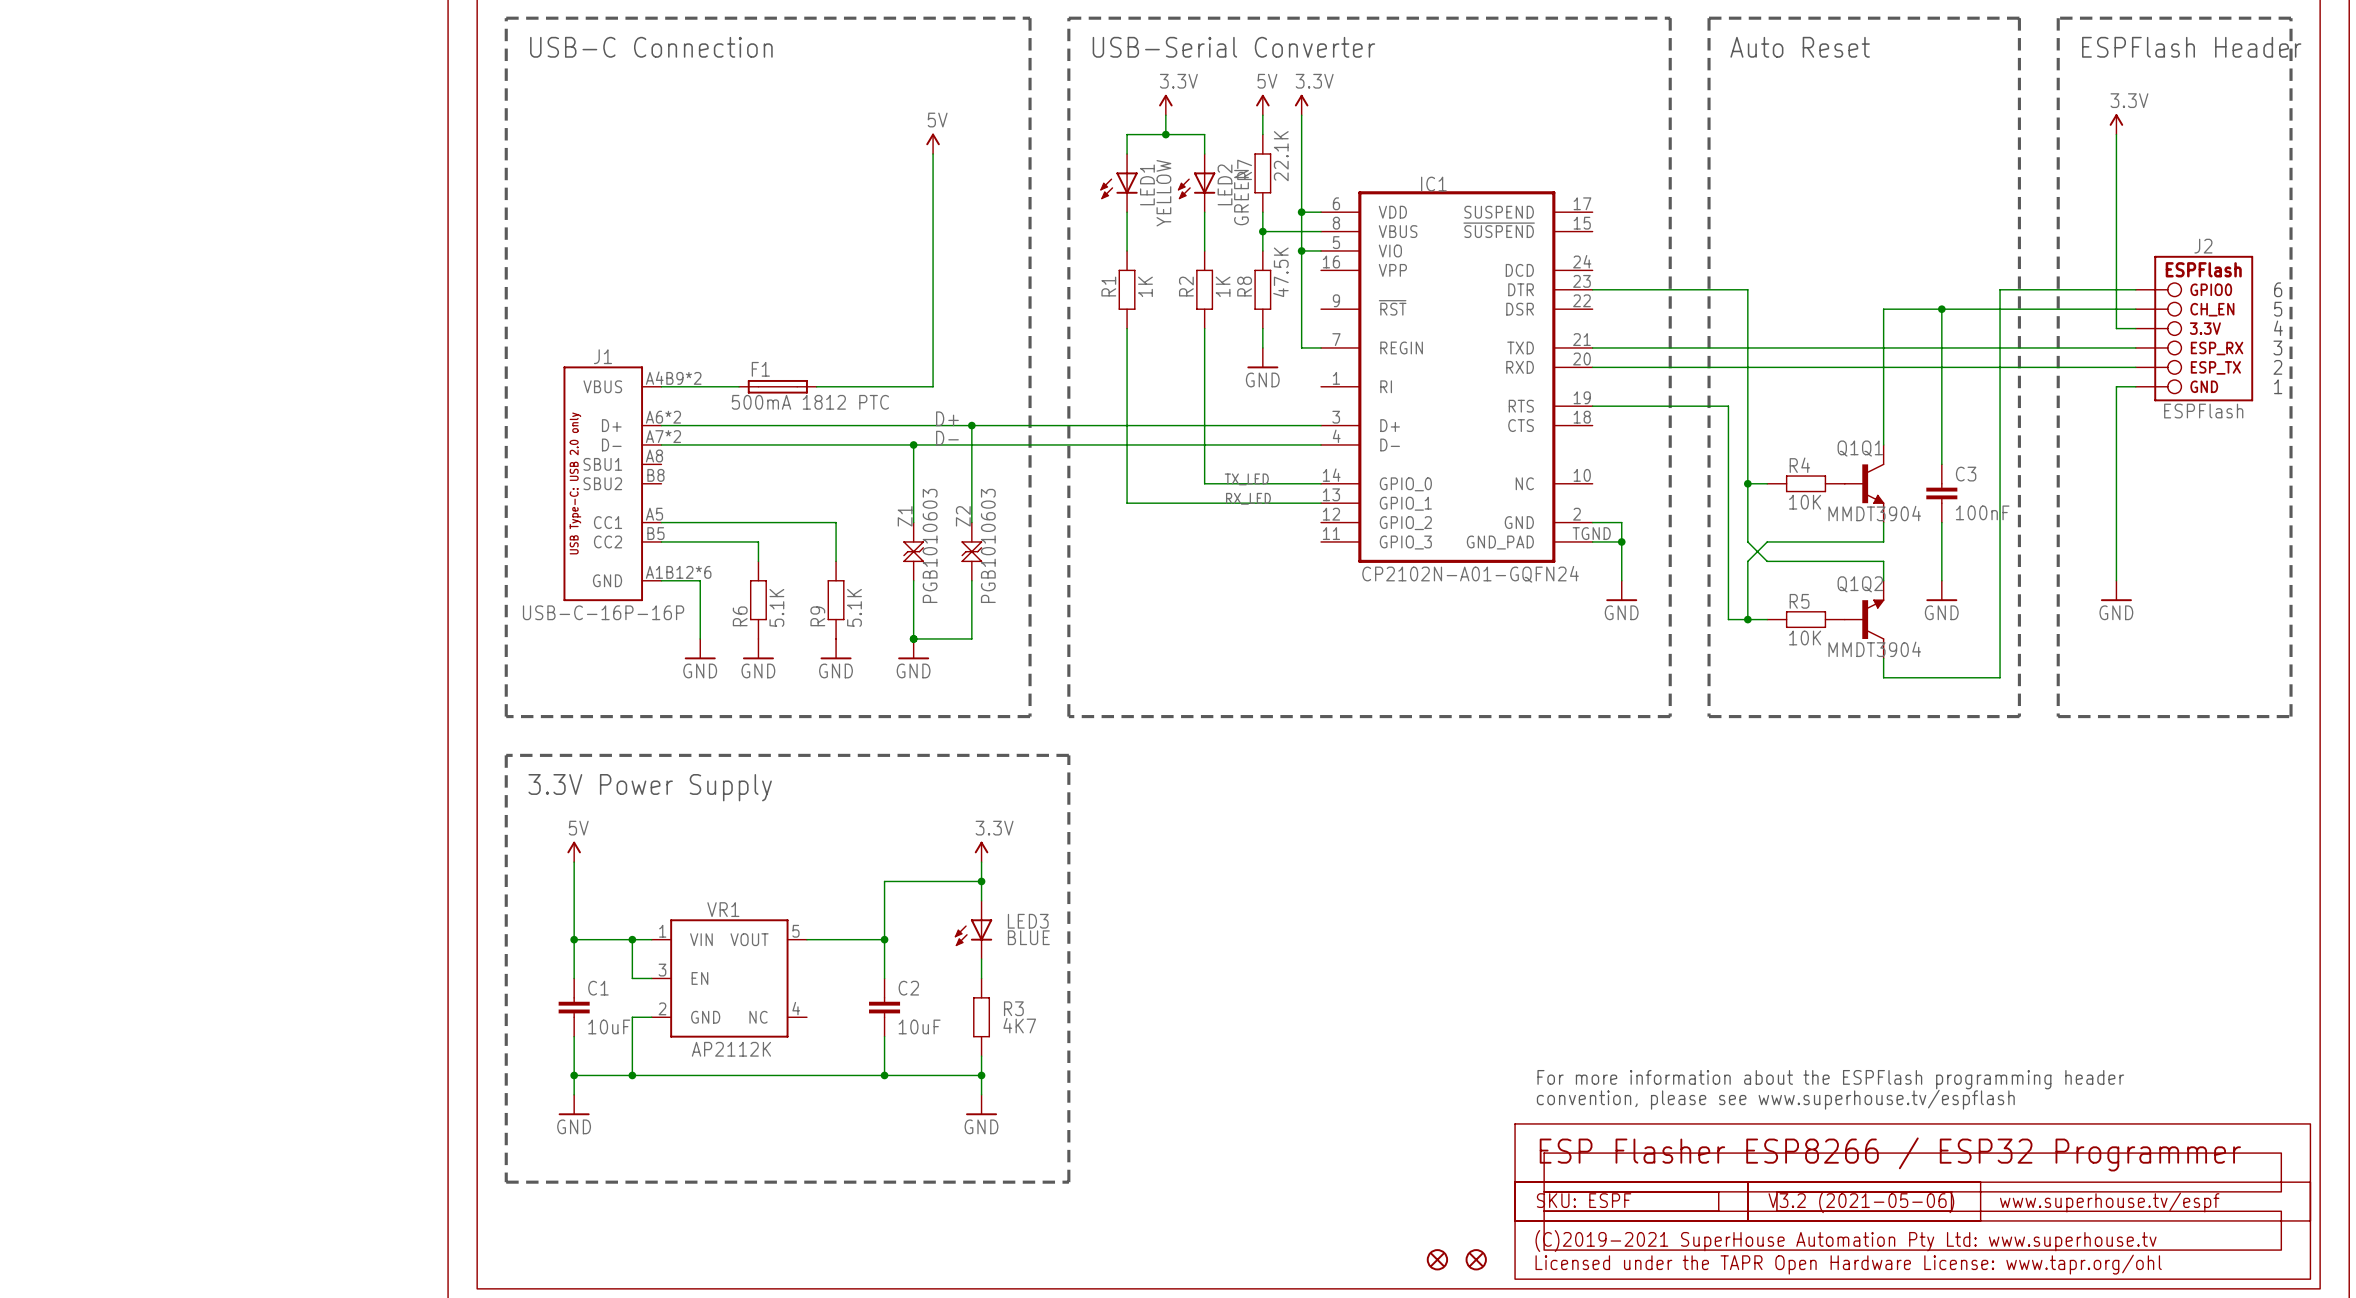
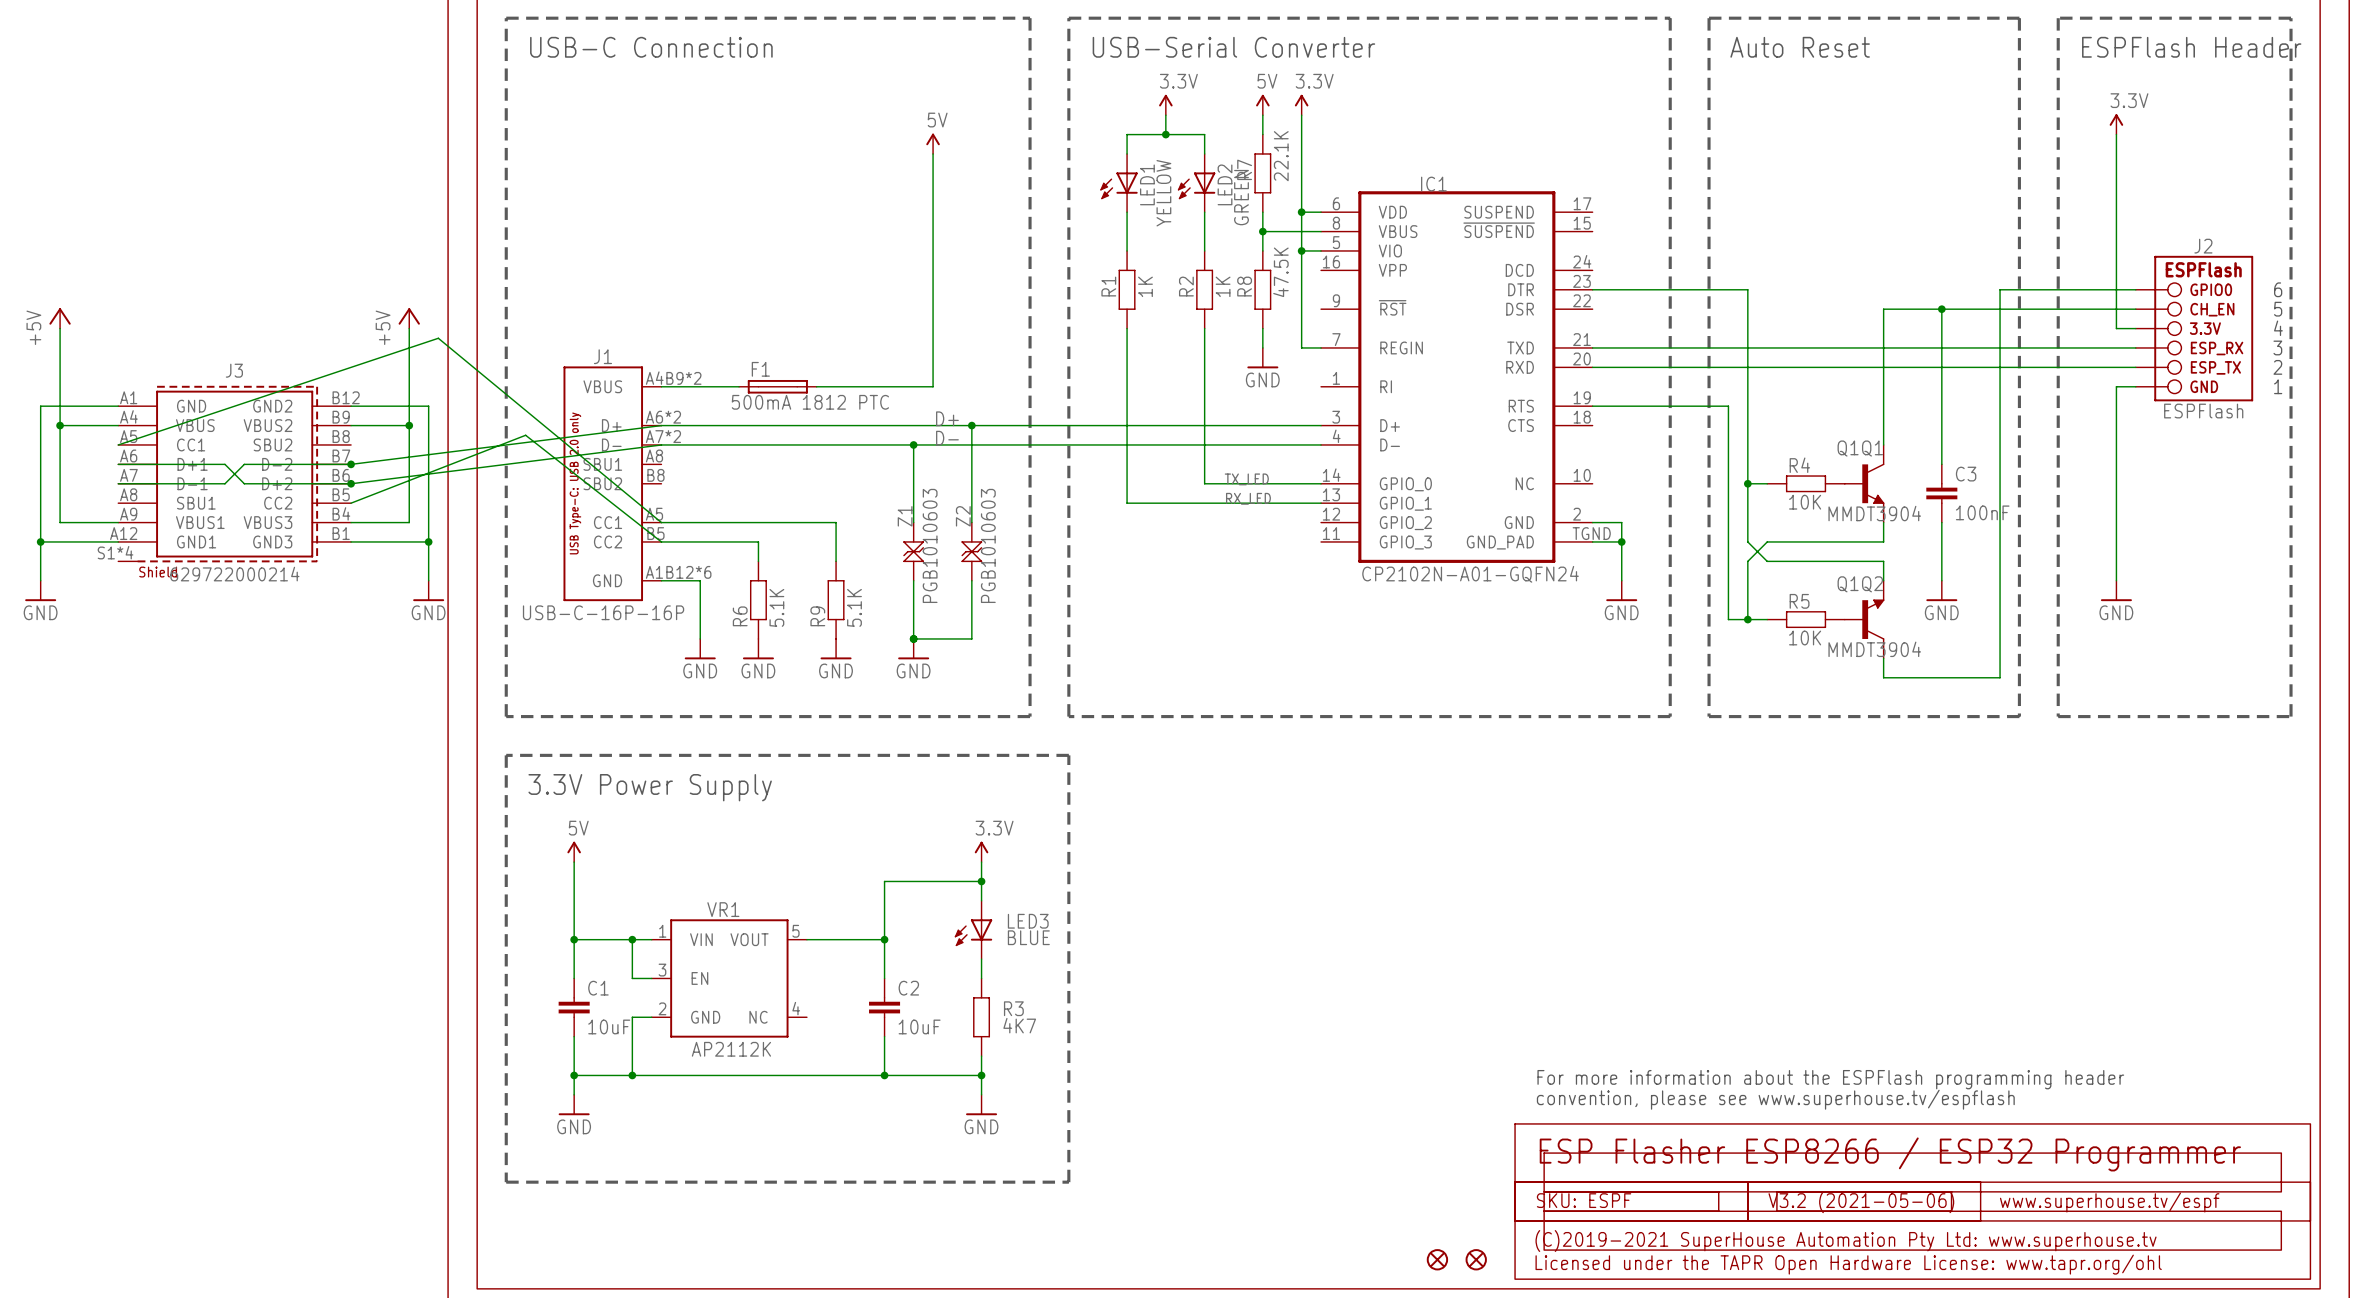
power symbol: none -> +5V (60, 318)
power symbol: none -> +5V (409, 318)
wire: none -> (60, 328) (60, 522) (118, 522)
wire: none -> (409, 328) (409, 522) (351, 522)
wire: none -> (118, 406) (40, 406) (40, 580)
wire: none -> (351, 406) (428, 406) (428, 580)
wire: none -> (60, 425) (118, 425)
junction: none -> (60, 425)
wire: none -> (351, 425) (409, 425)
junction: none -> (409, 425)
wire: none -> (661, 425) (351, 464) (244, 464) (224, 483) (118, 483)
wire: none -> (118, 444) (438, 338) (661, 522)
wire: none -> (661, 444) (351, 483) (244, 483) (224, 464) (118, 464)
junction: none -> (351, 464)
J3: none -> 629722000214 (234, 474)
junction: none -> (351, 483)
wire: none -> (351, 503) (525, 435) (661, 541)
wire: none -> (40, 541) (118, 541)
junction: none -> (40, 541)
wire: none -> (351, 541) (428, 541)
junction: none -> (428, 541)
power symbol: none -> GND (40, 590)
power symbol: none -> GND (428, 590)

